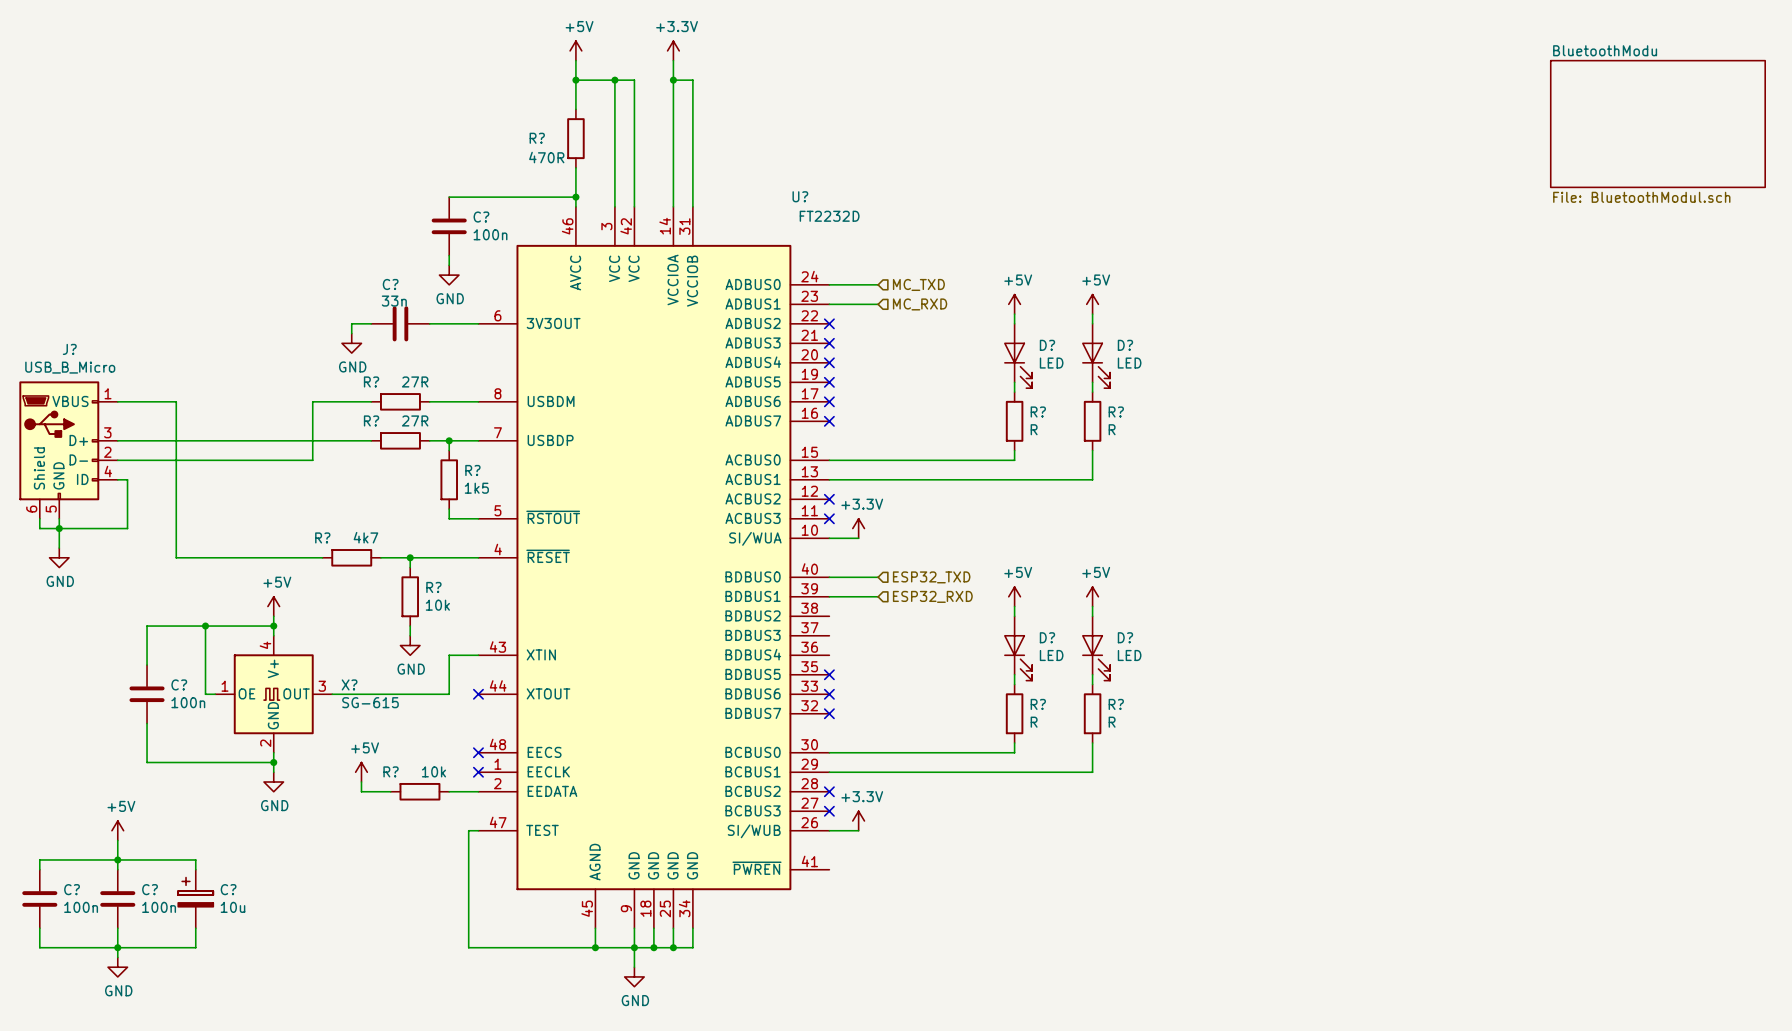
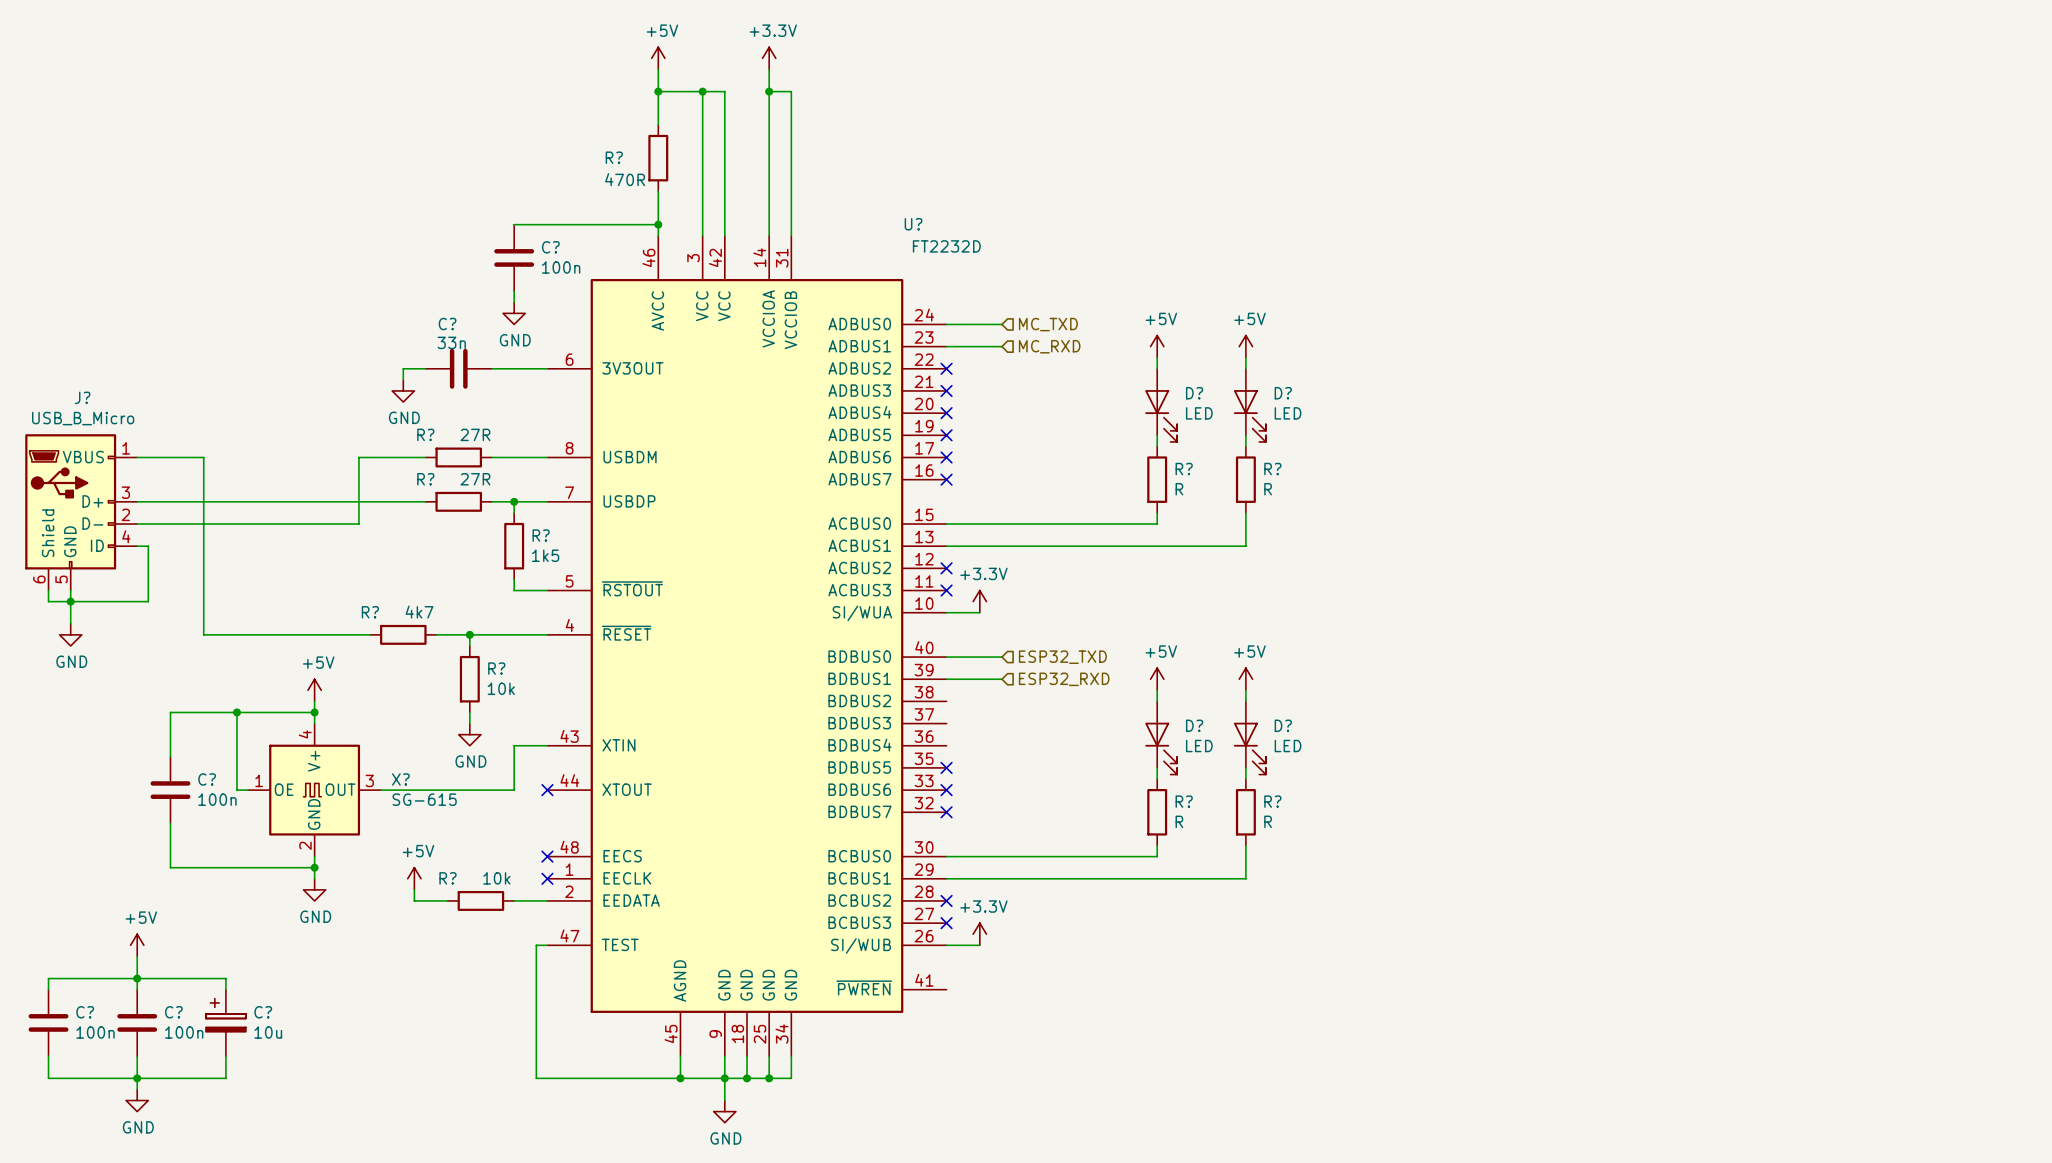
sheet BluetoothModu: File: BluetoothModul.sch (1657, 124) -> none

